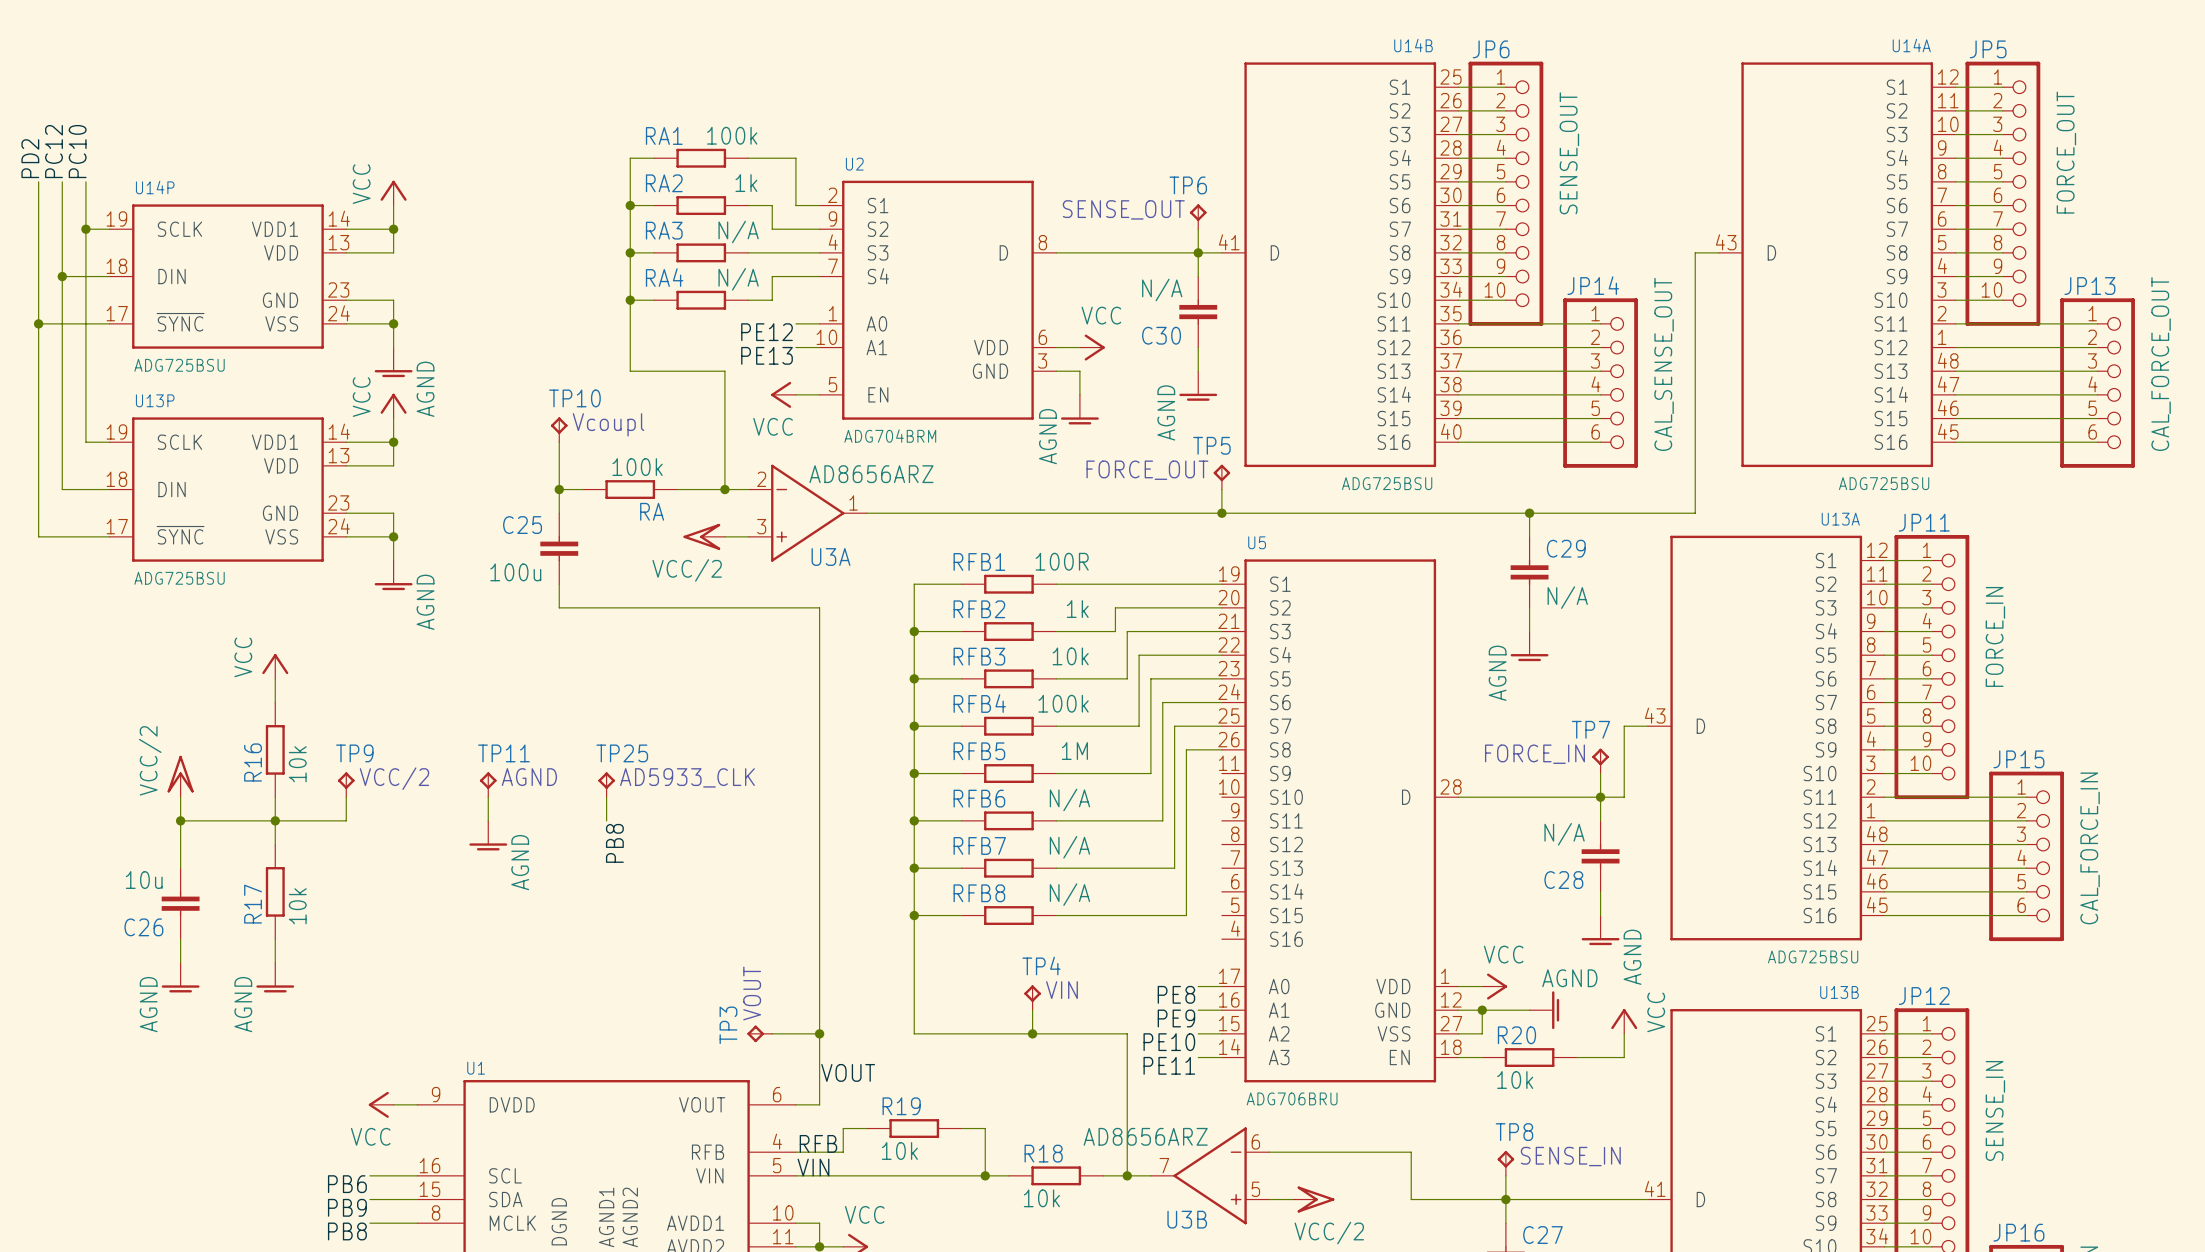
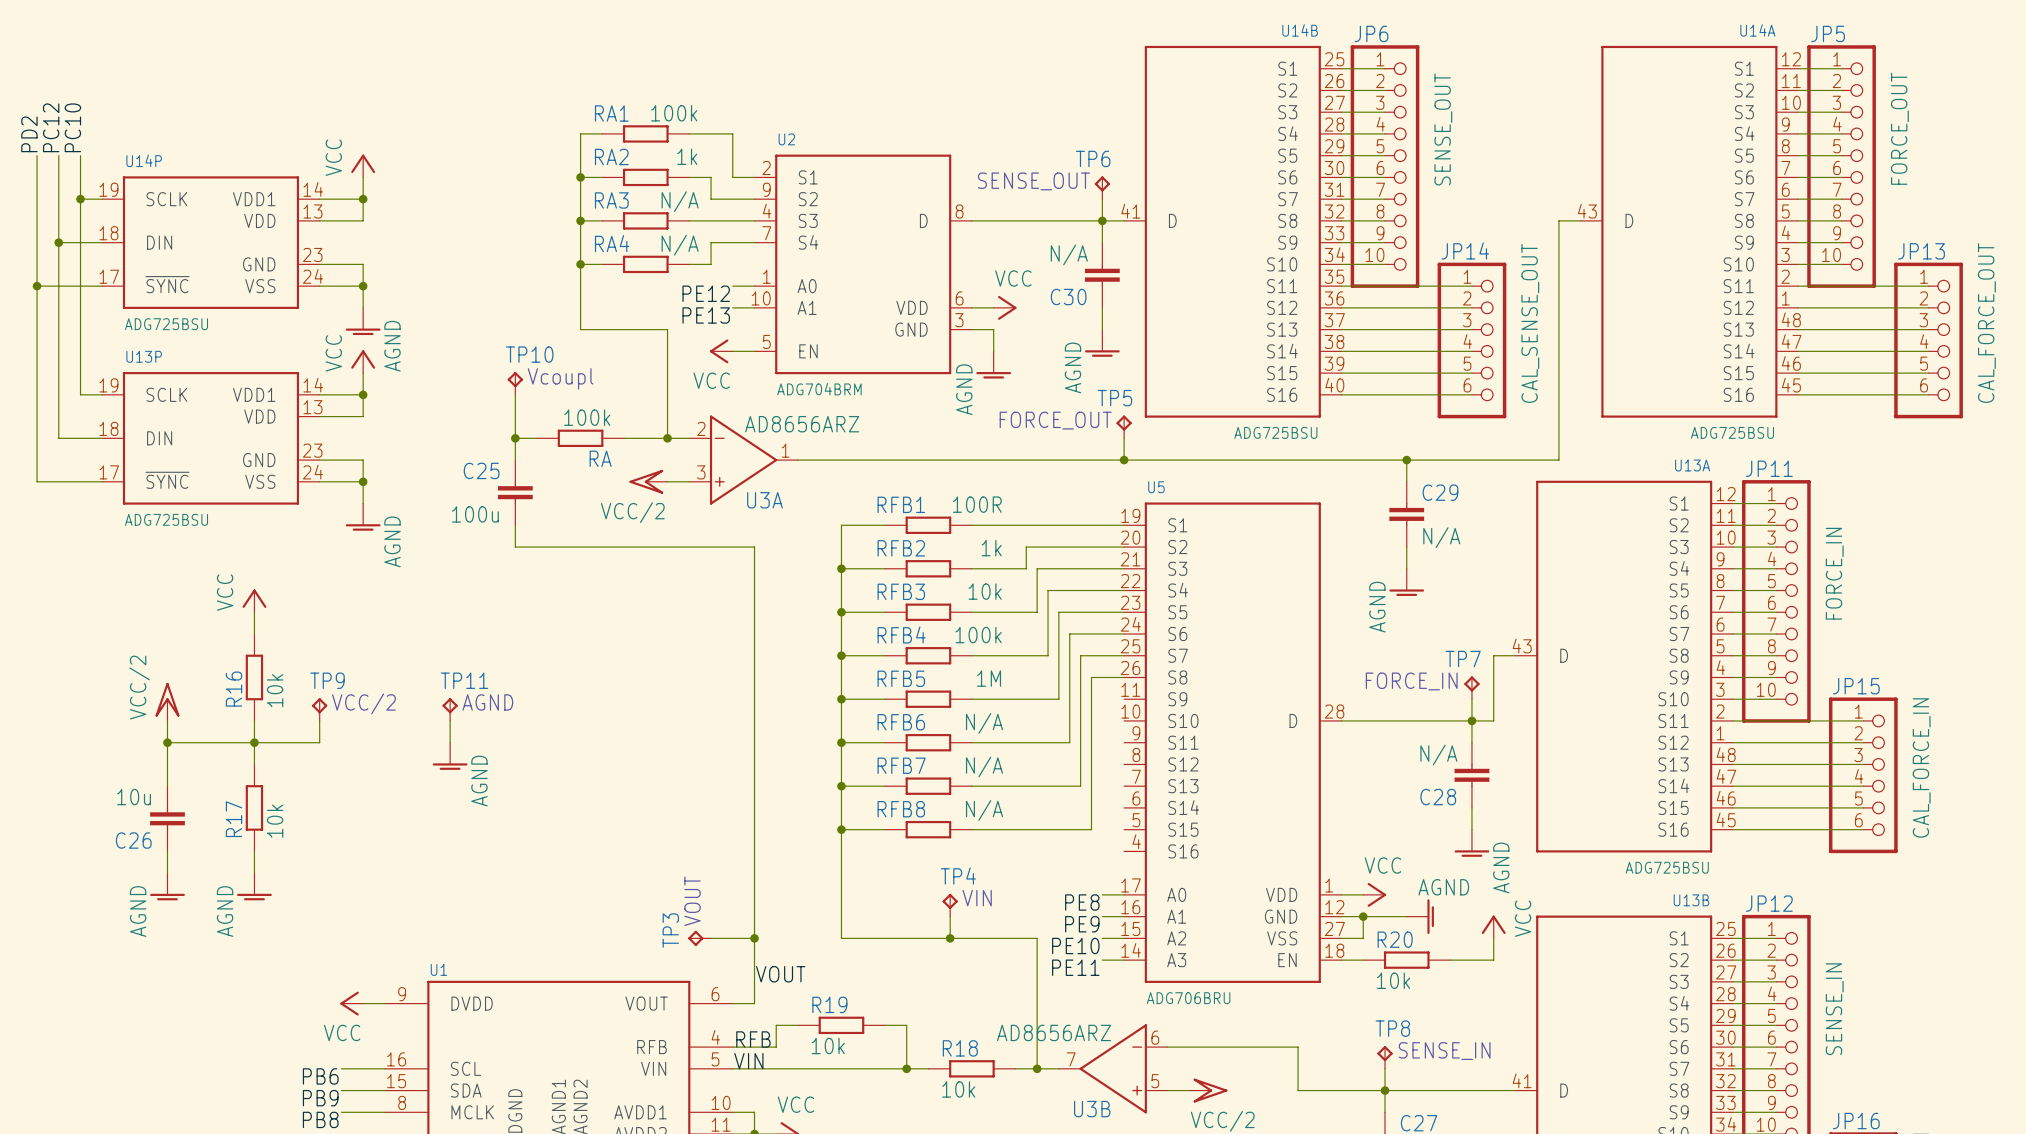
TP25: (606, 784) -> none
wire: (606, 797) (606, 820) -> none
label: PB8 (614, 843) -> none

